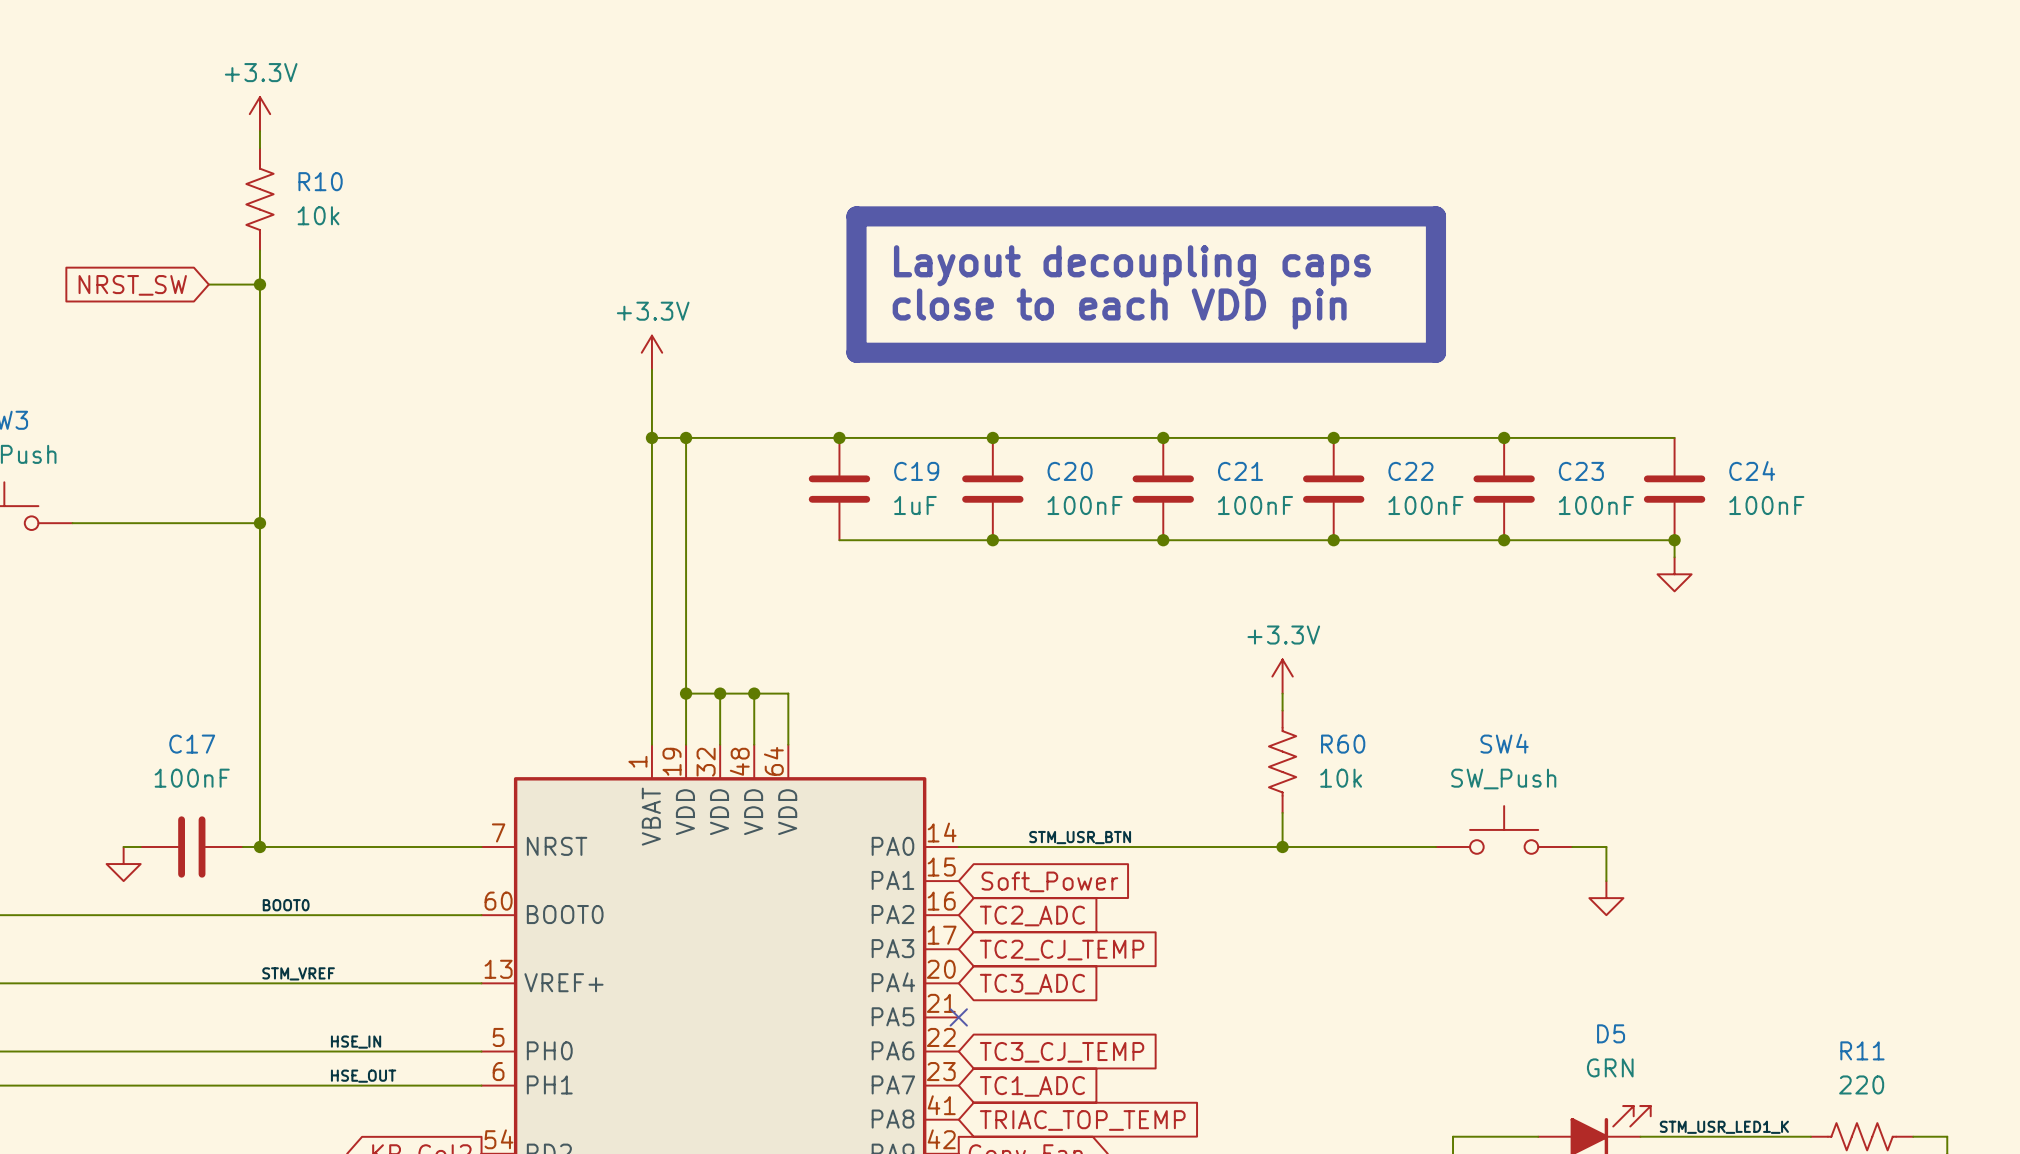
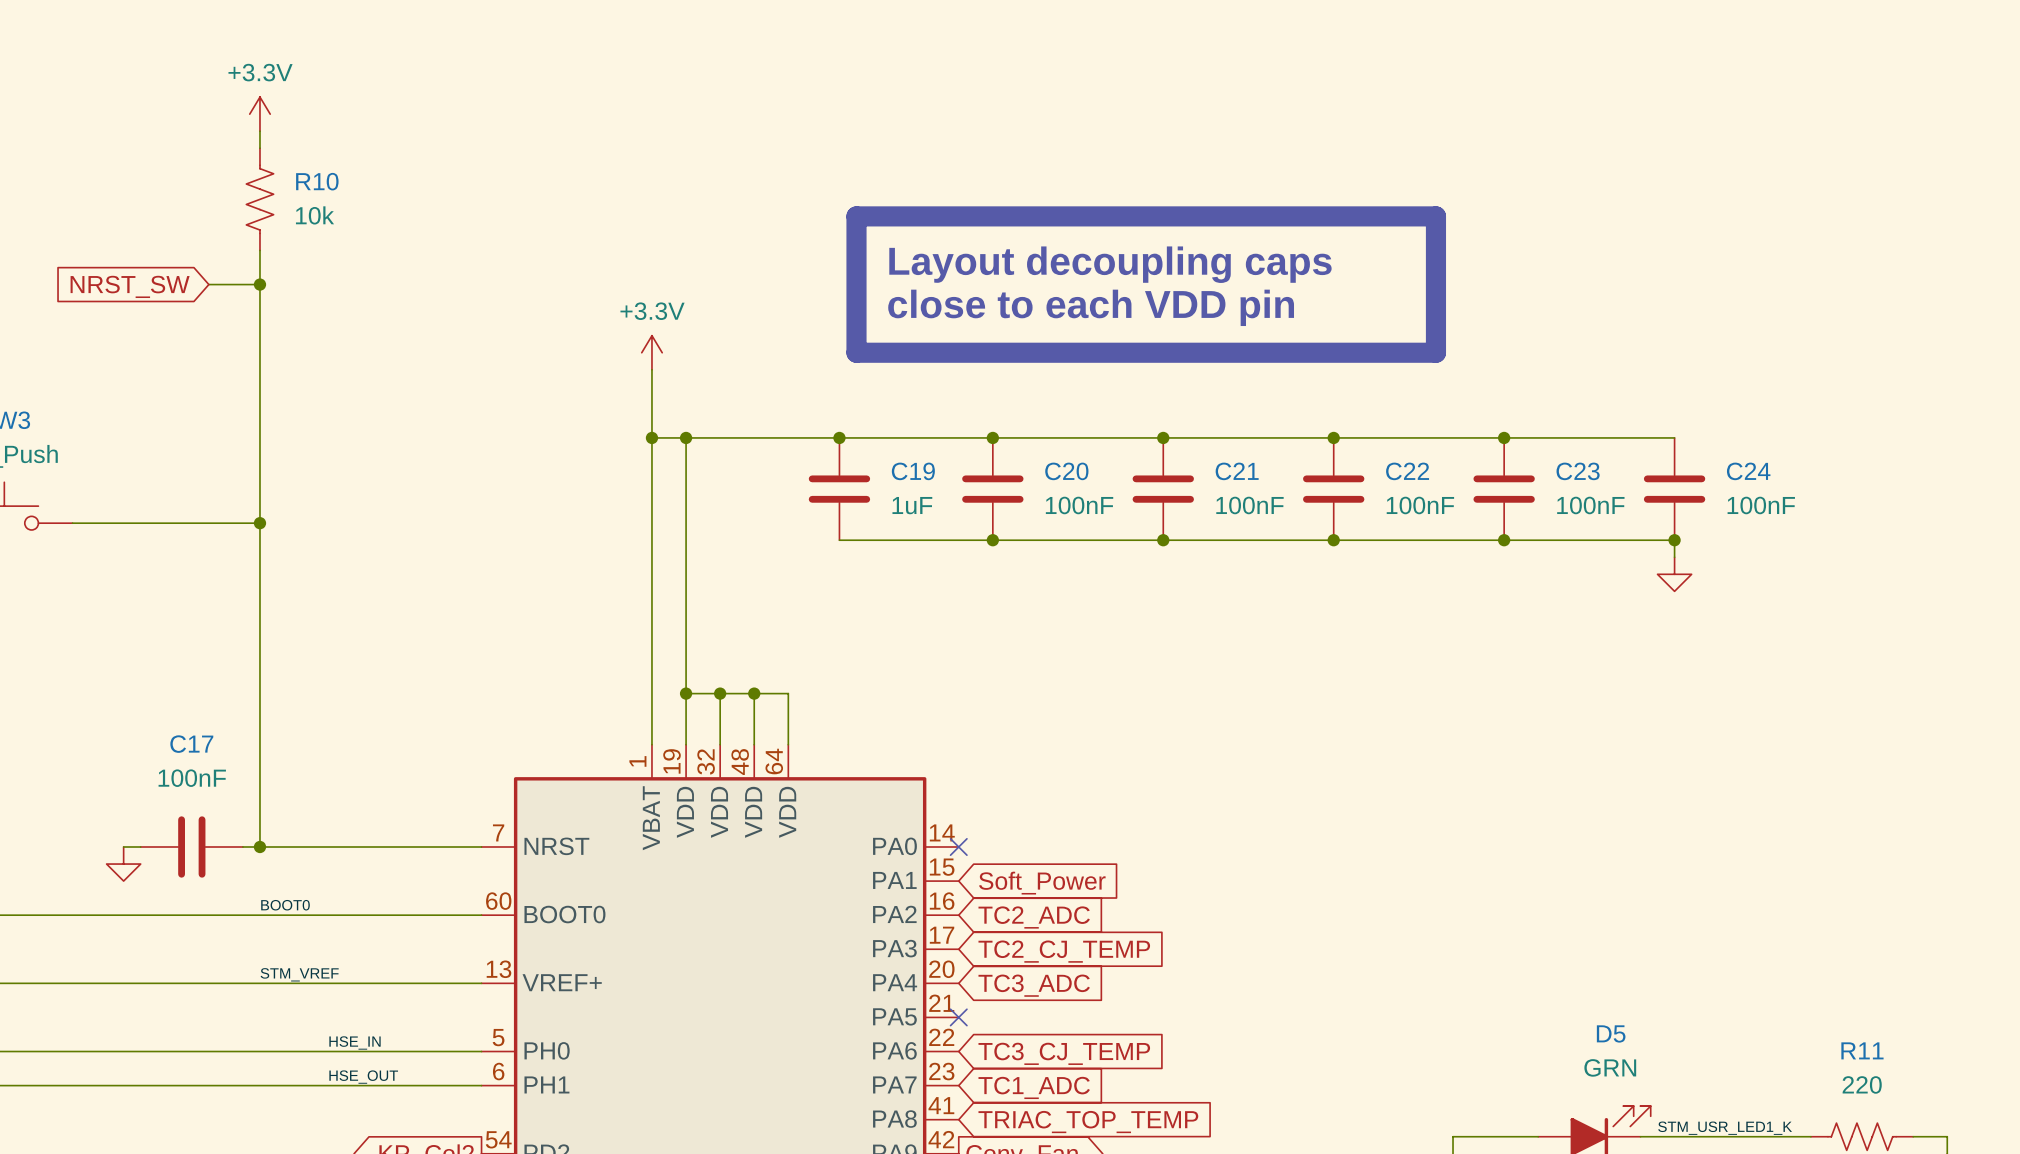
power symbol: +3.3V (1282, 676) -> none
wire: (1282, 693) (1282, 710) -> none
R60: 10k (1282, 761) -> none
wire: (1282, 812) (1282, 846) -> none
SW4: SW_Push (1504, 829) -> none
label: STM_USR_BTN (1080, 837) -> none
wire: (958, 846) (1435, 846) -> none
no-connect mark: none -> (958, 846)
junction: (1282, 846) -> none
wire: (1572, 846) (1606, 846) (1606, 881) -> none
power symbol: (1606, 898) -> none

